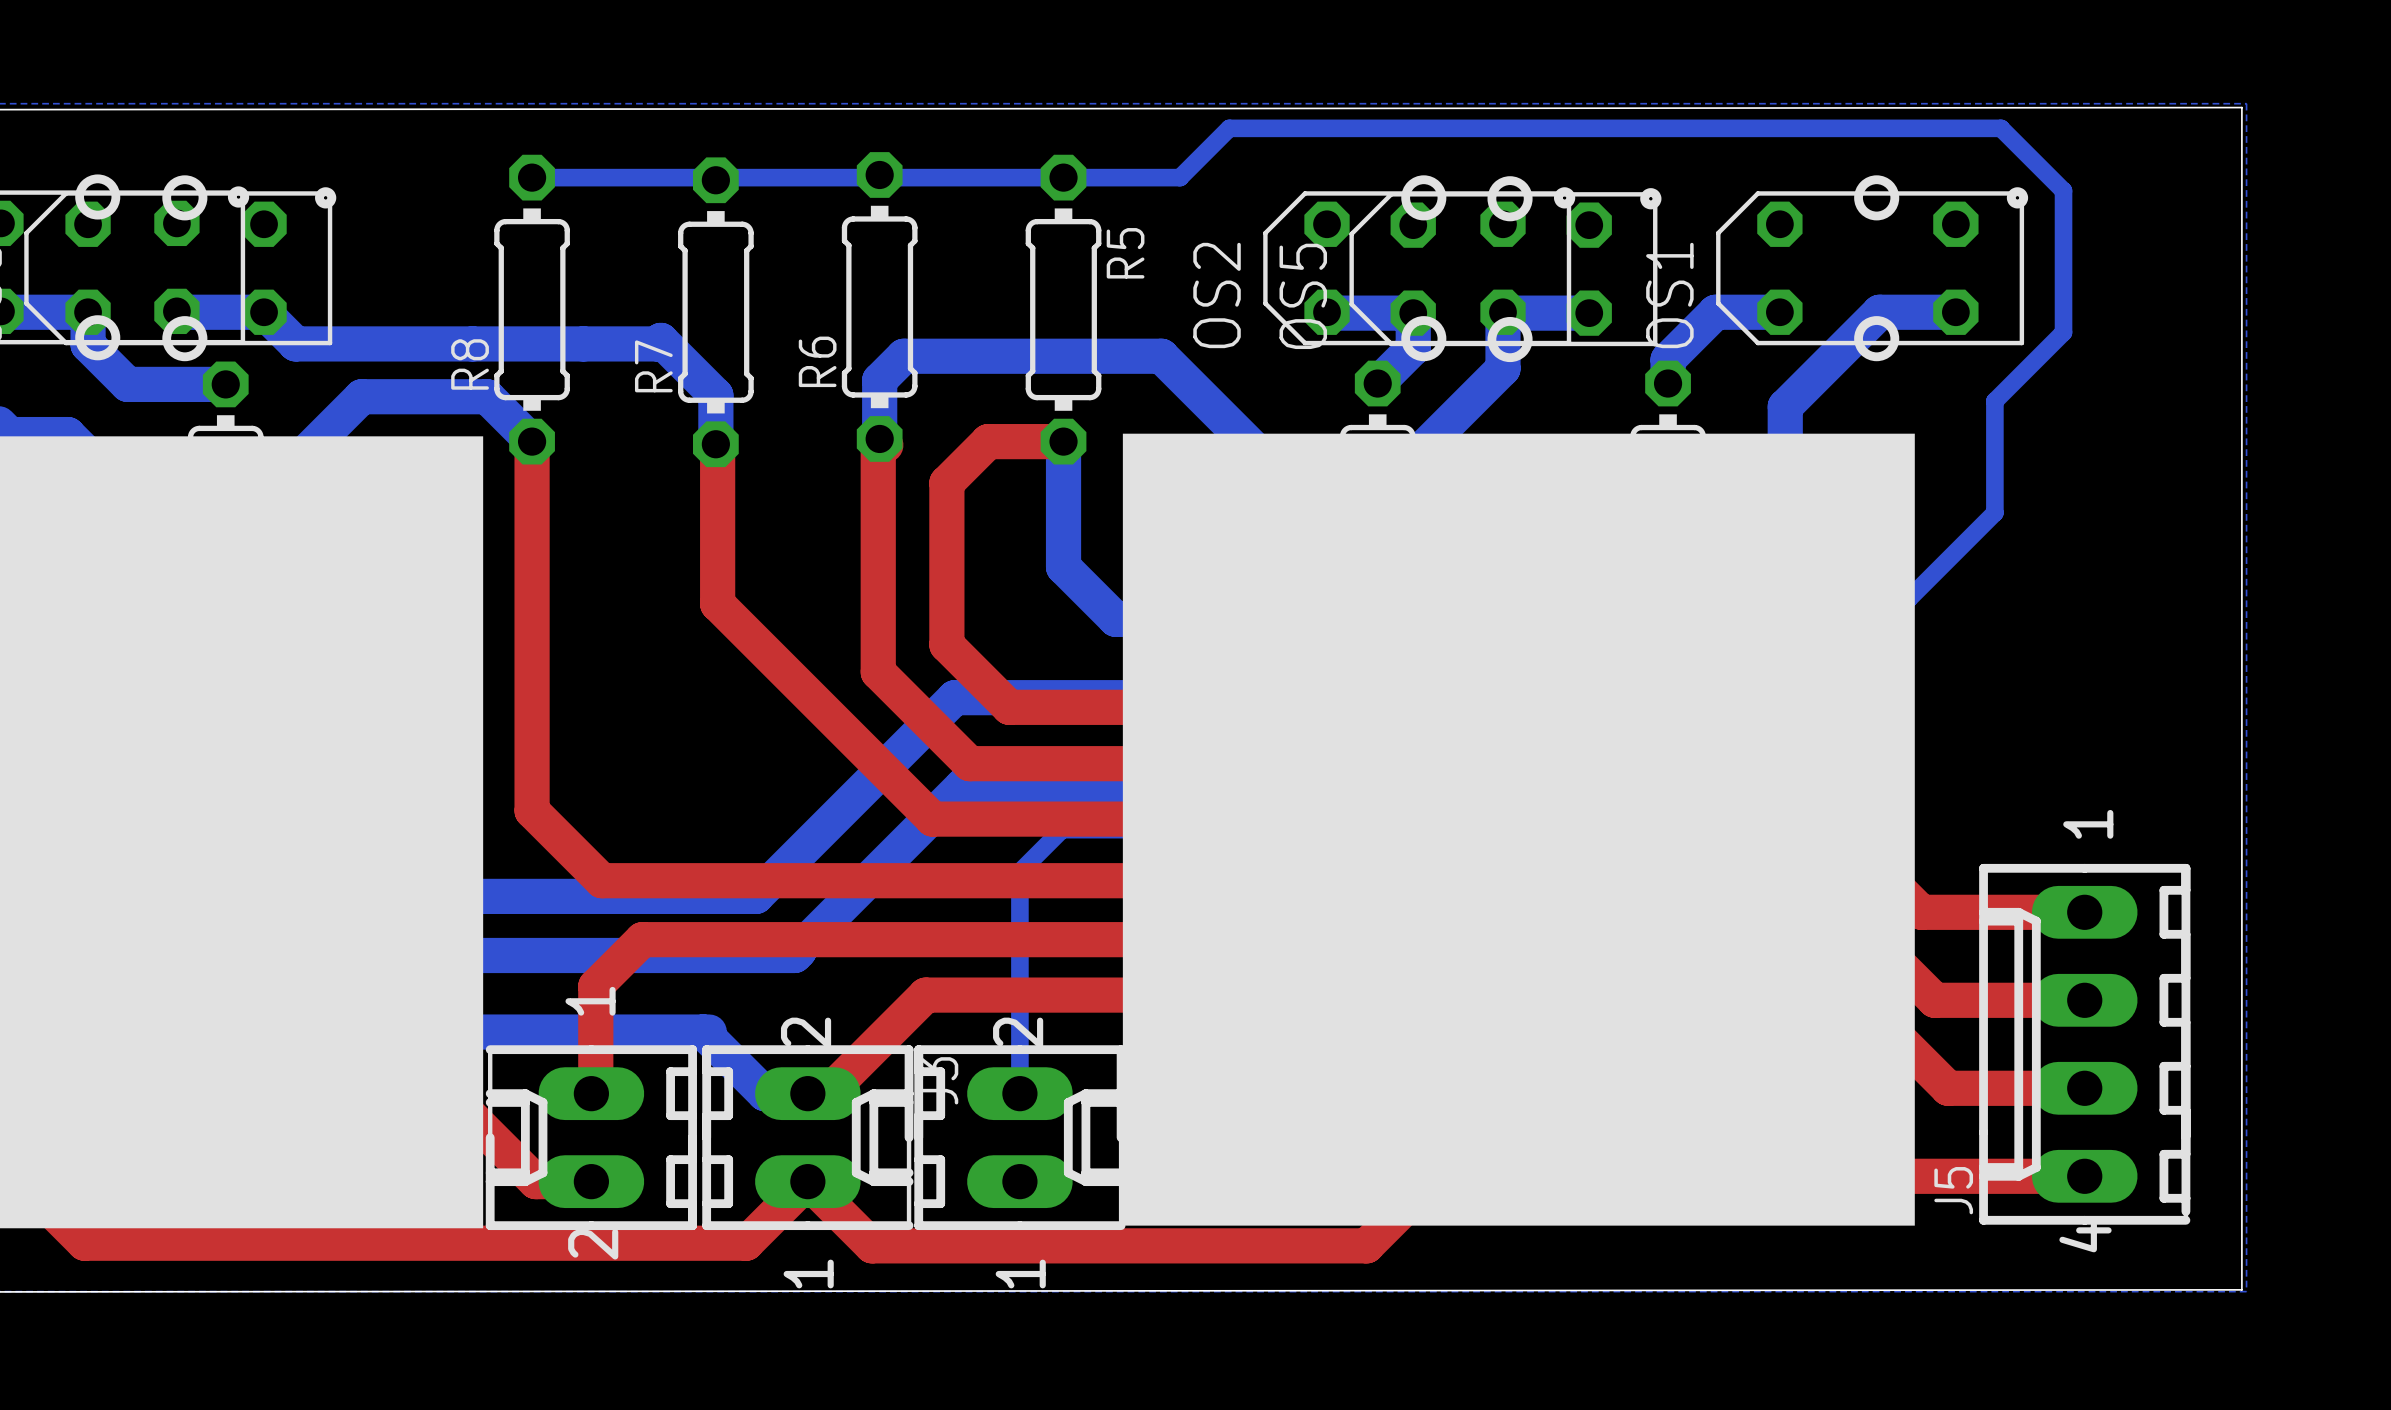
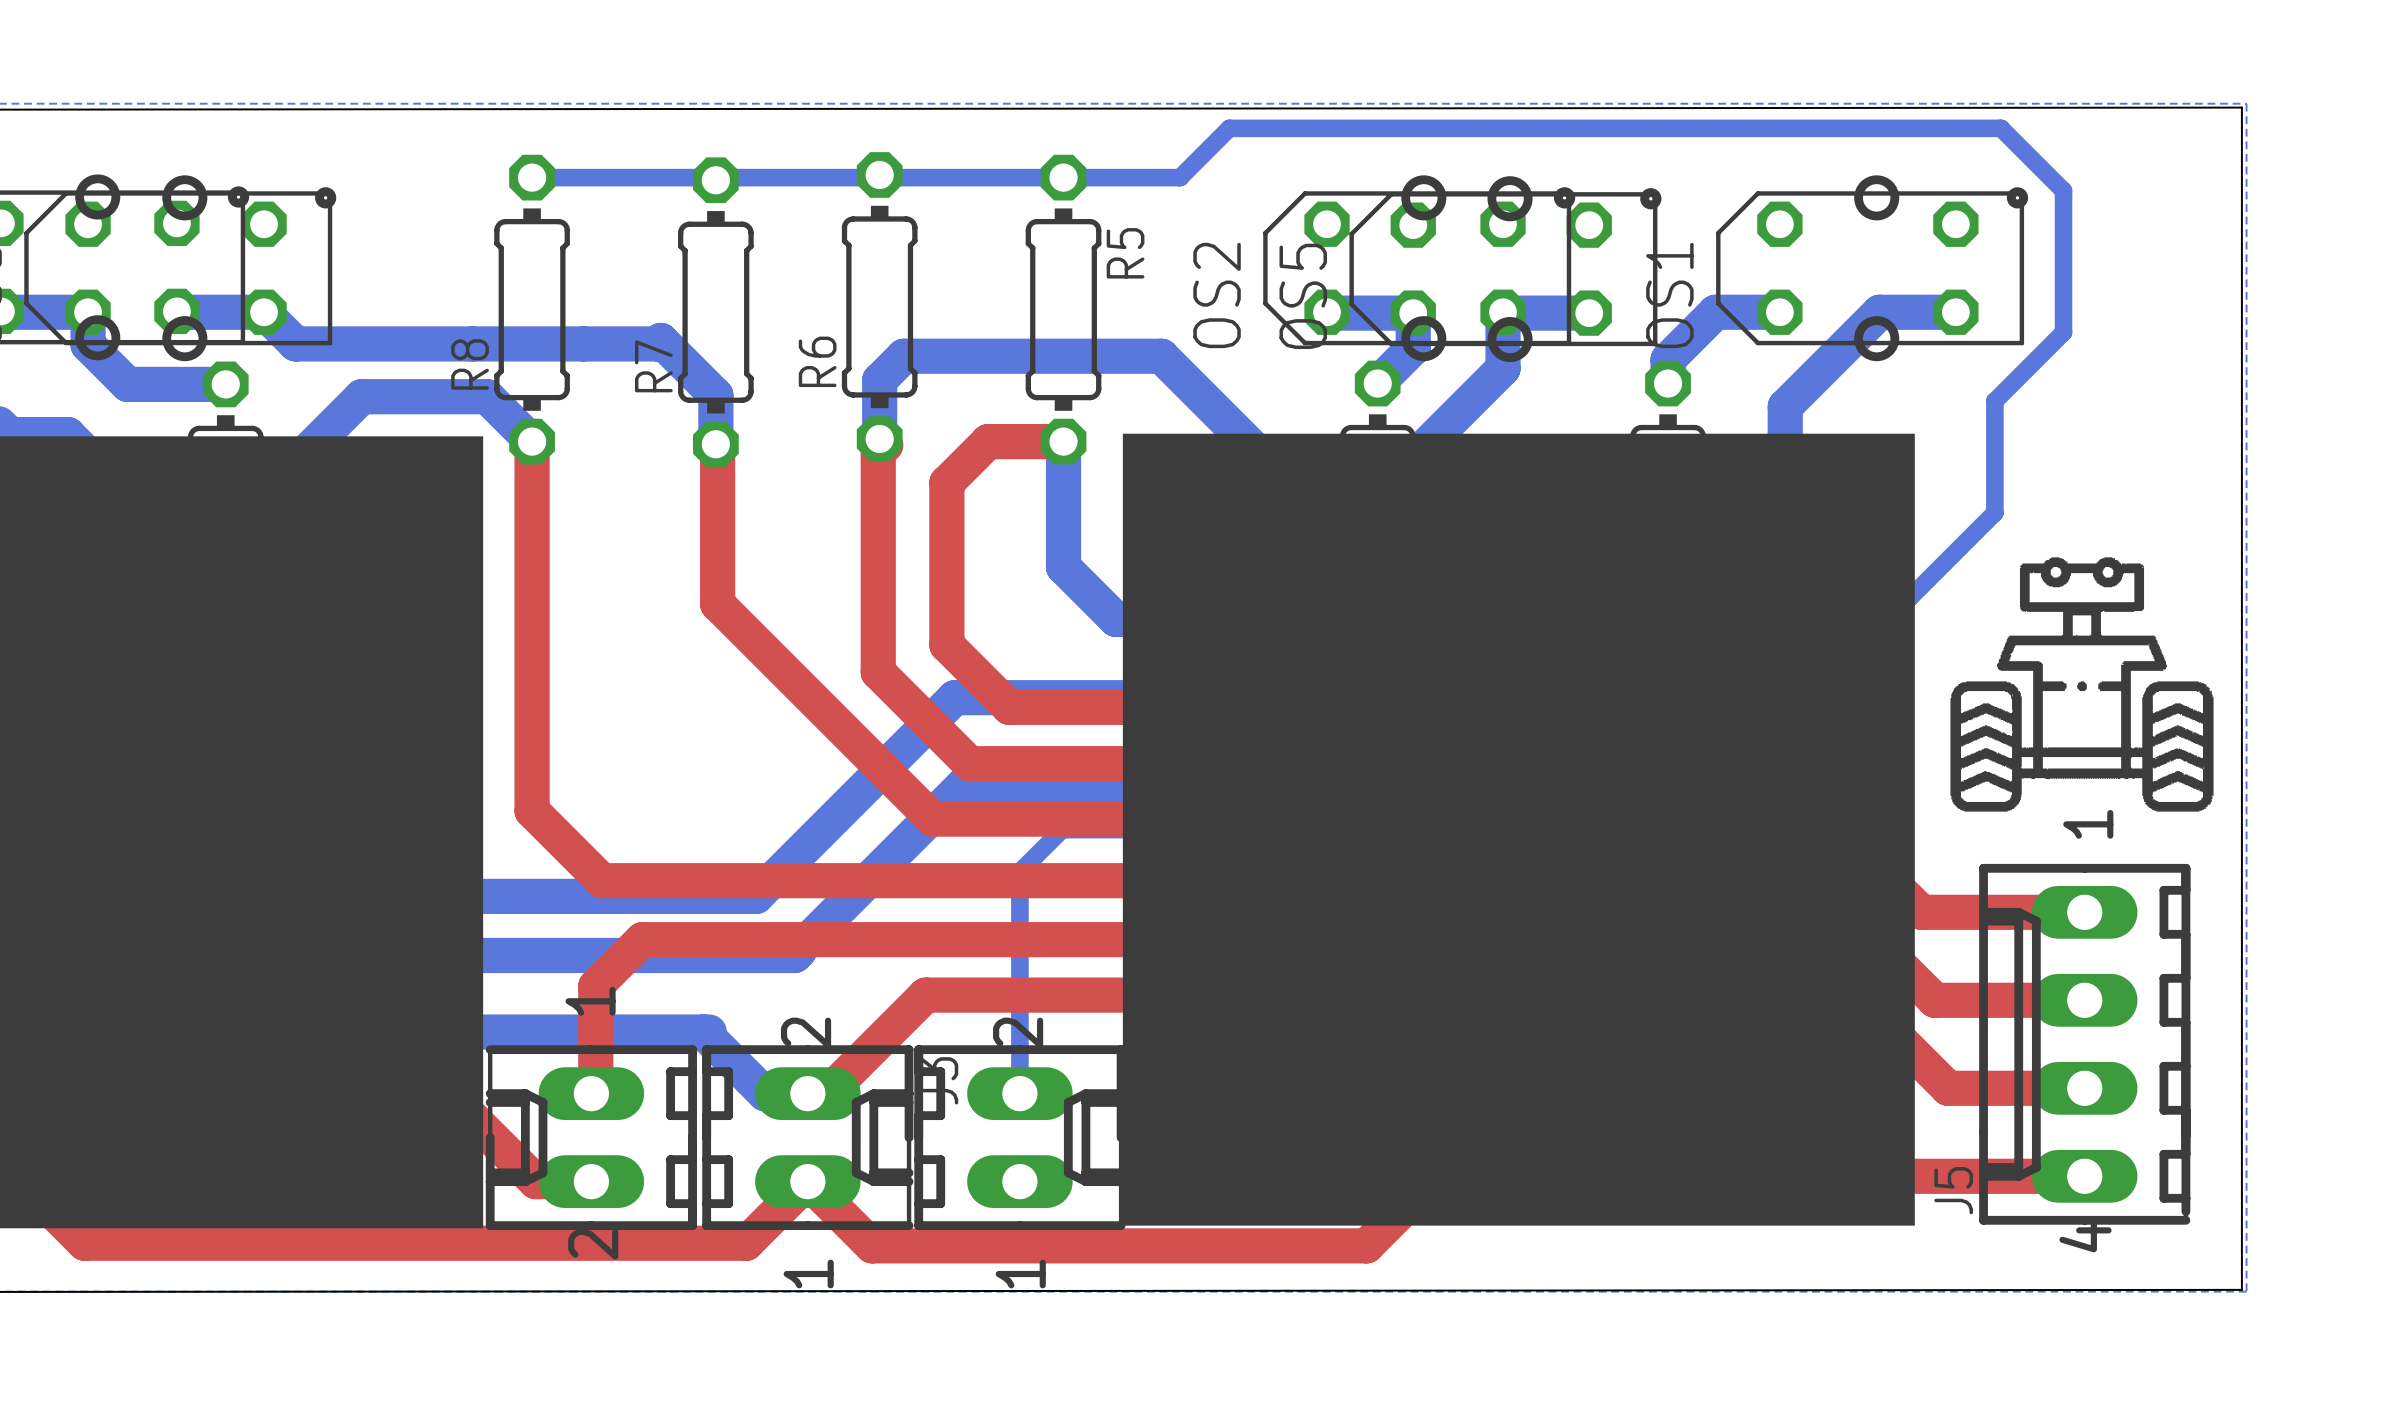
drawing: none -> [1950, 557, 2214, 812]

